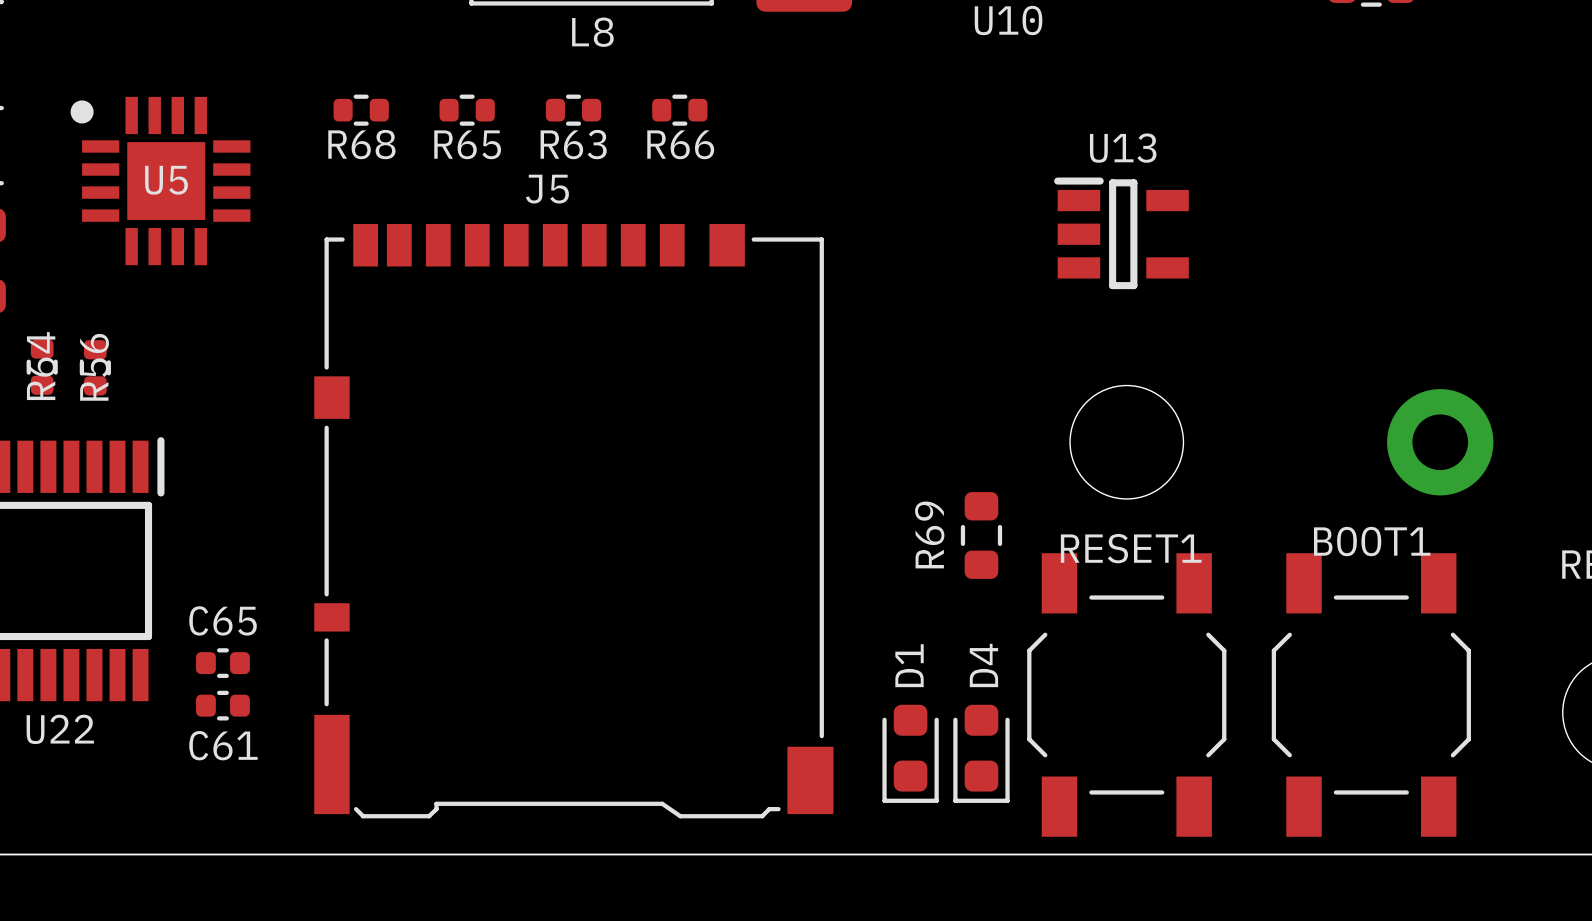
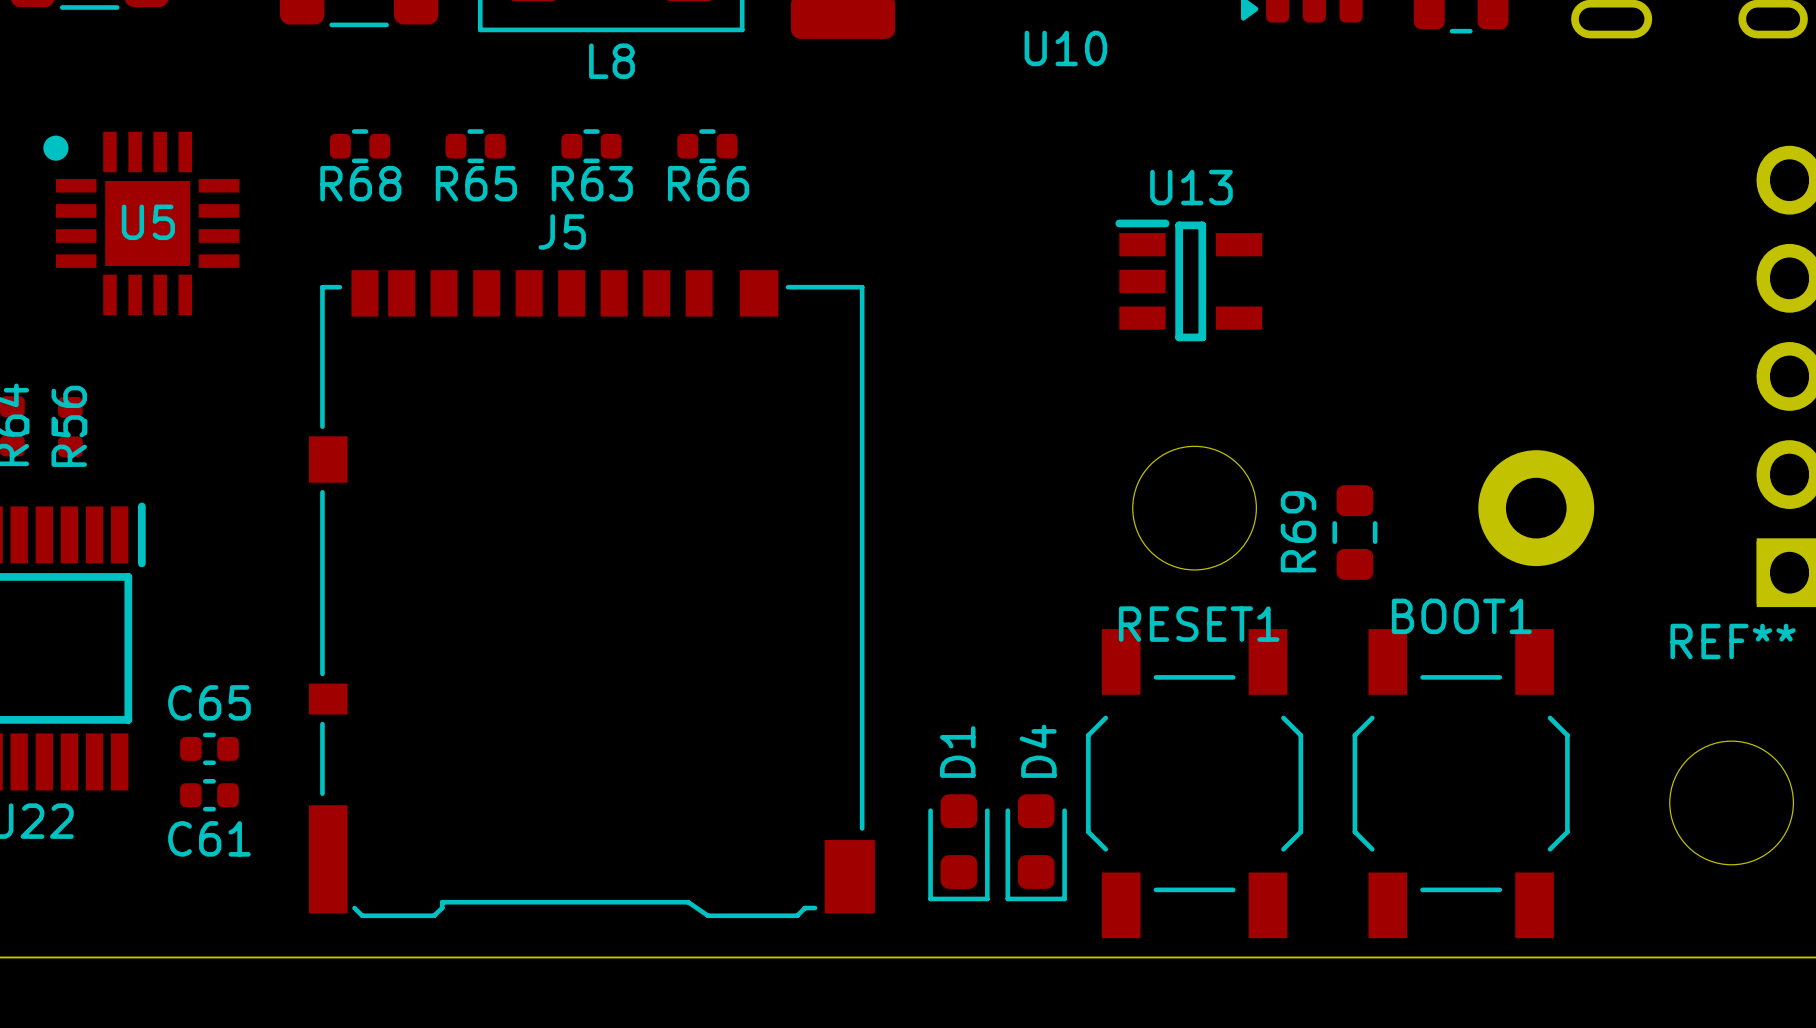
R69 position: (981, 535) -> (1354, 532)

